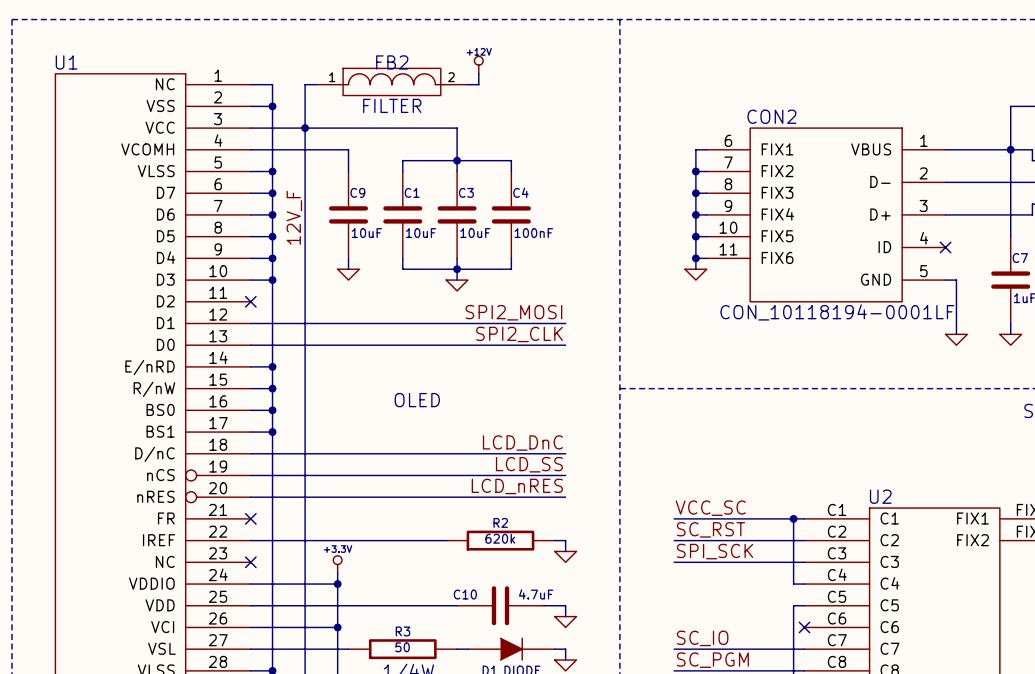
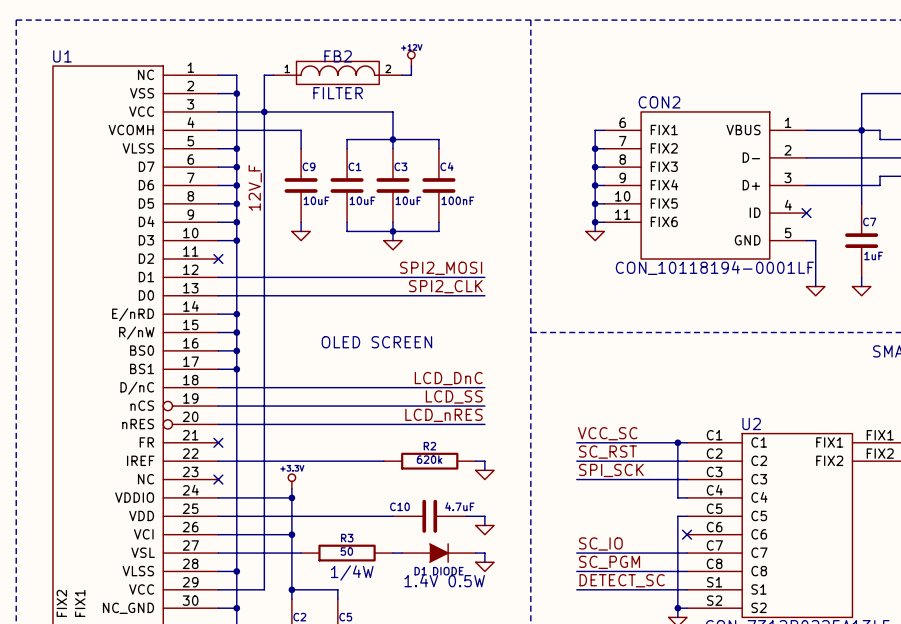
text: OLED (417, 400) -> none
text: none -> OLED SCREEN (376, 342)

